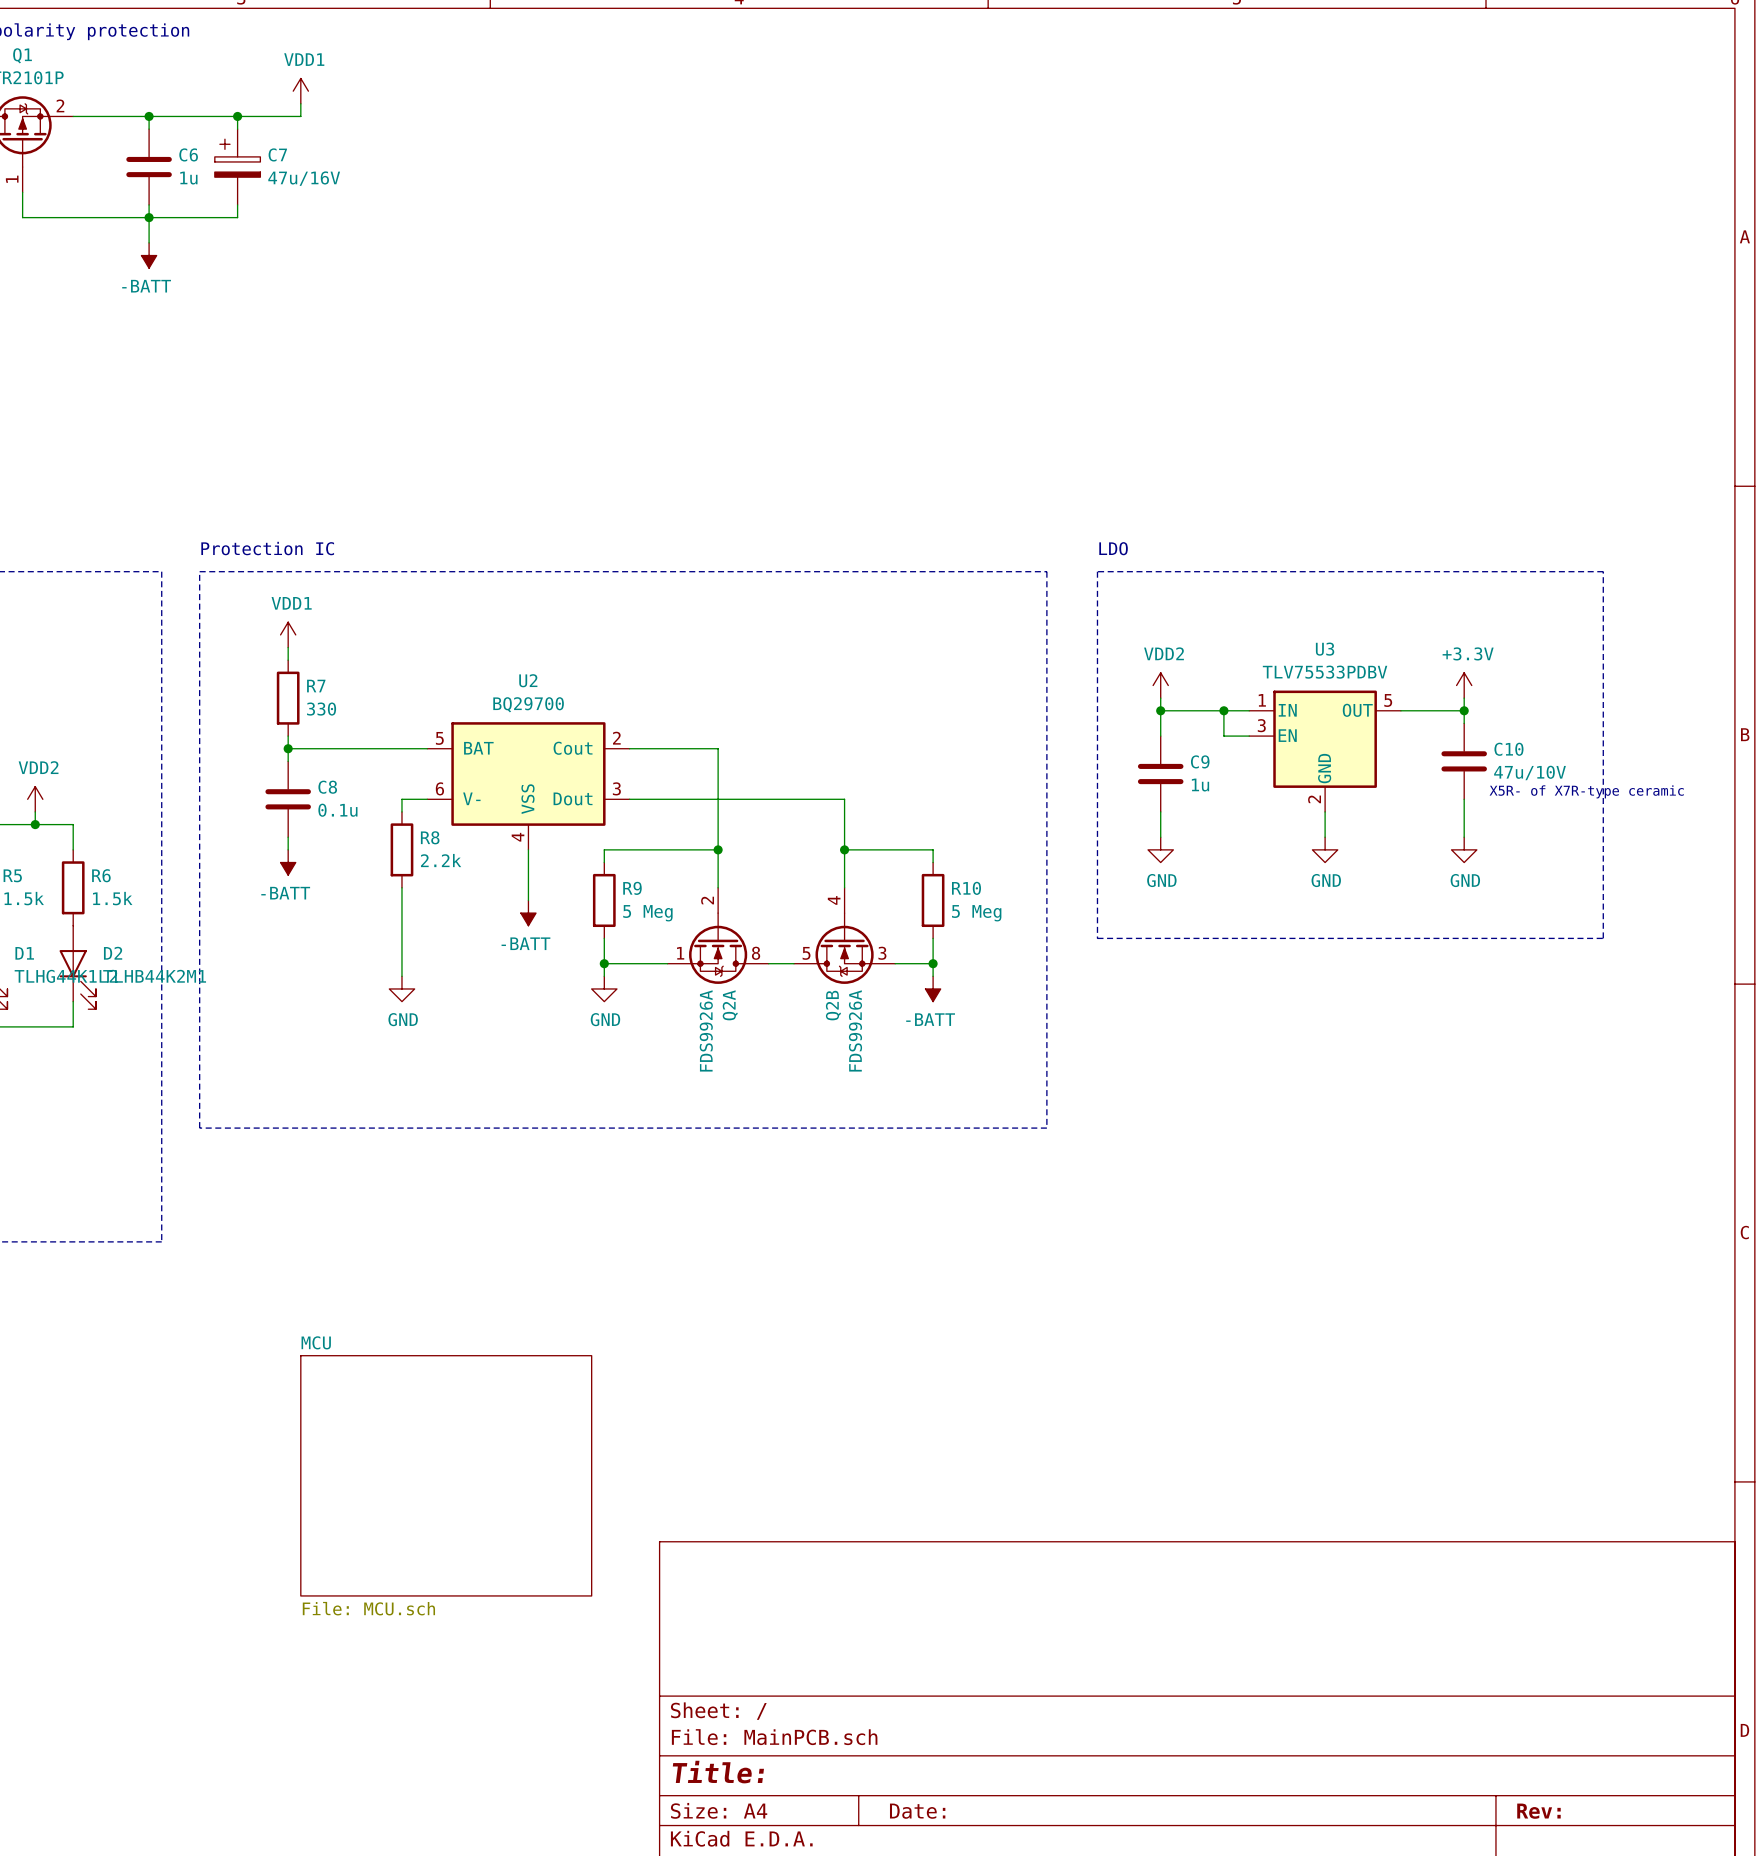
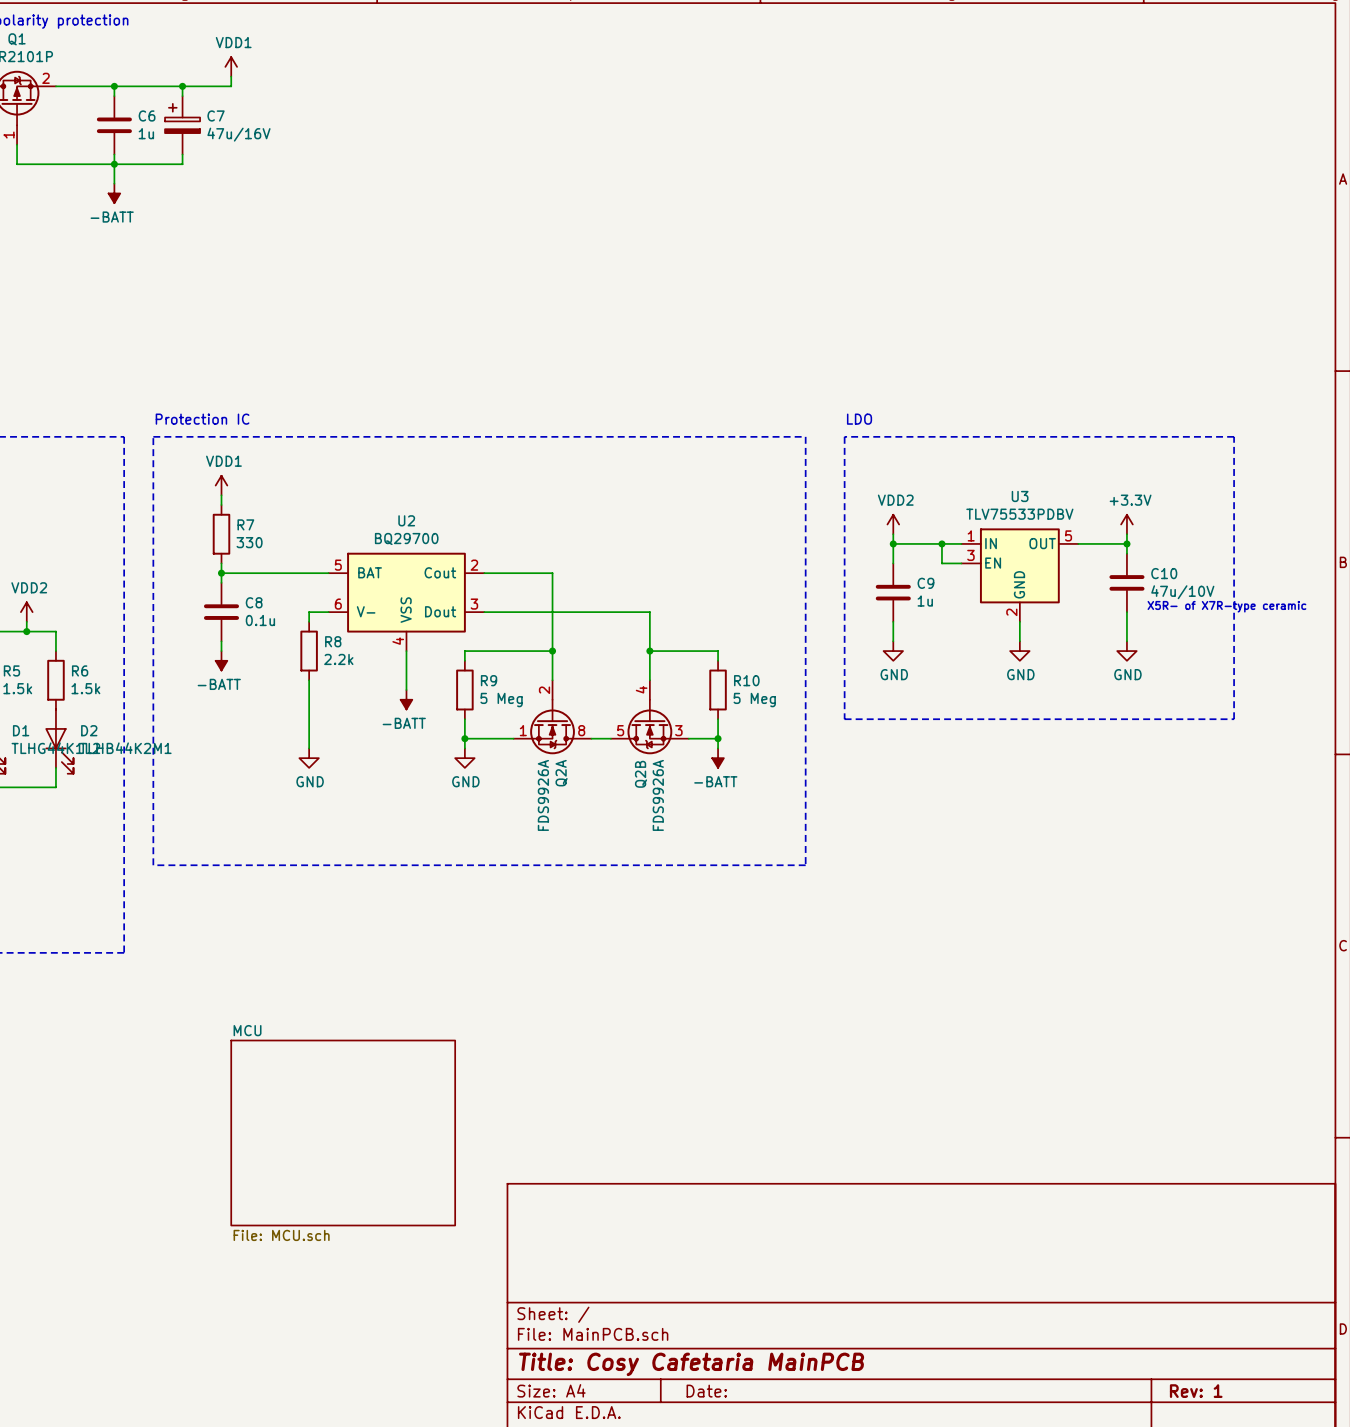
title block: Title: (718, 1772) -> Title: Cosy Cafetaria MainPCB (691, 1364)
title block: Rev: (1538, 1811) -> Rev: 1 (1196, 1391)

